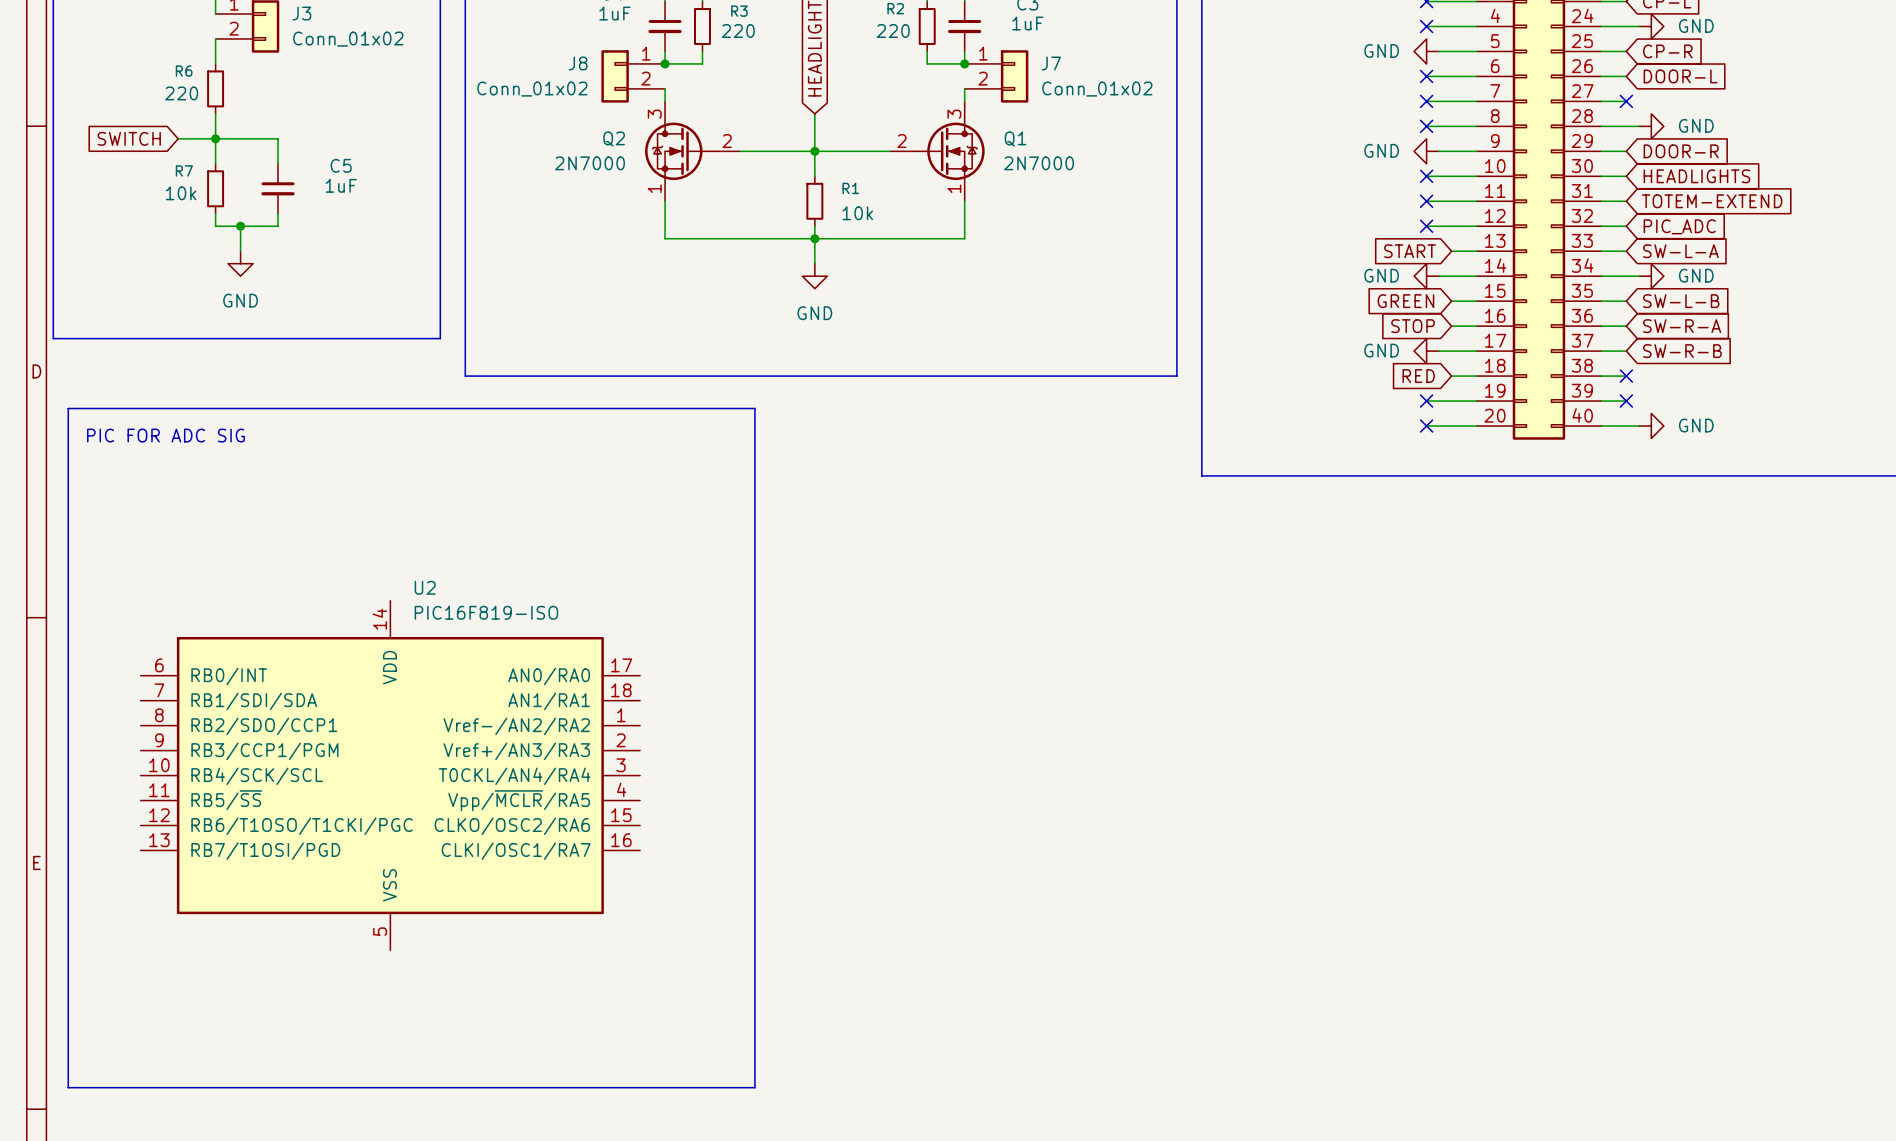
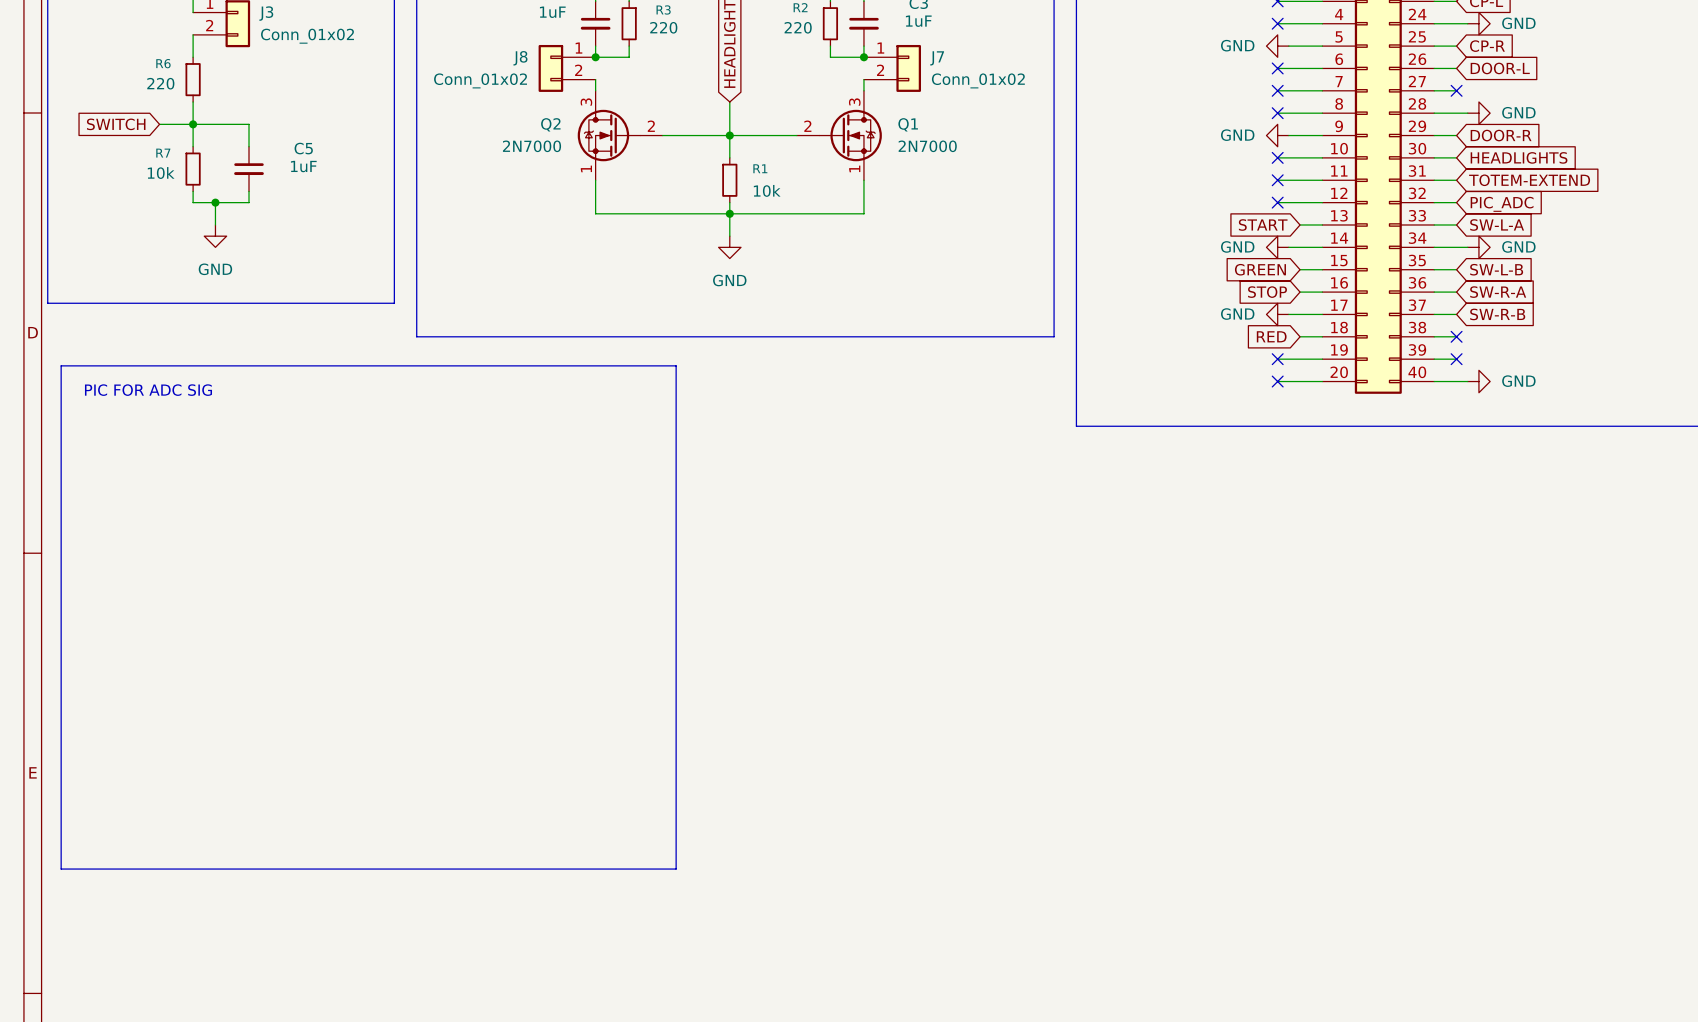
U2: PIC16F819-ISO (390, 775) -> none
line: (68, 970) (68, 1087) (754, 1087) (754, 970) -> (61, 869) (676, 869)

